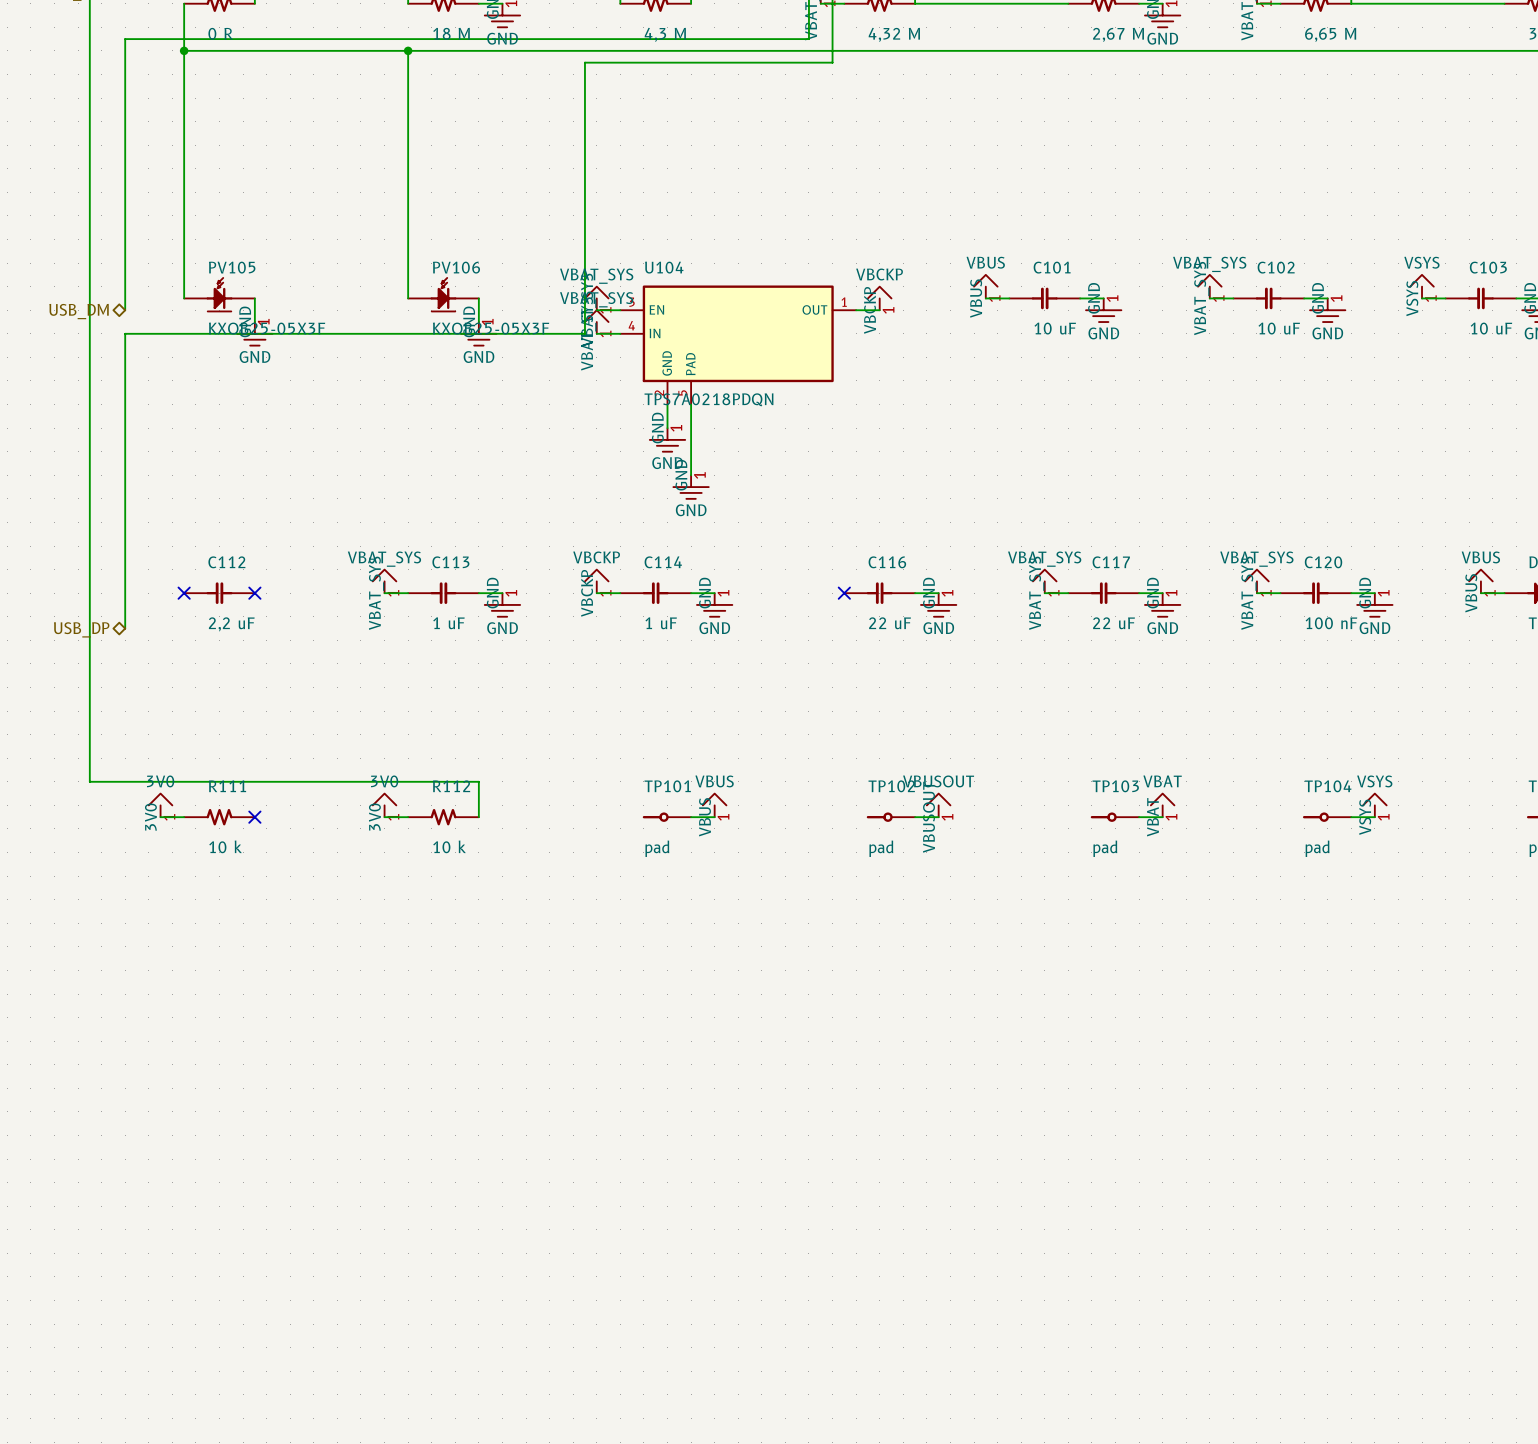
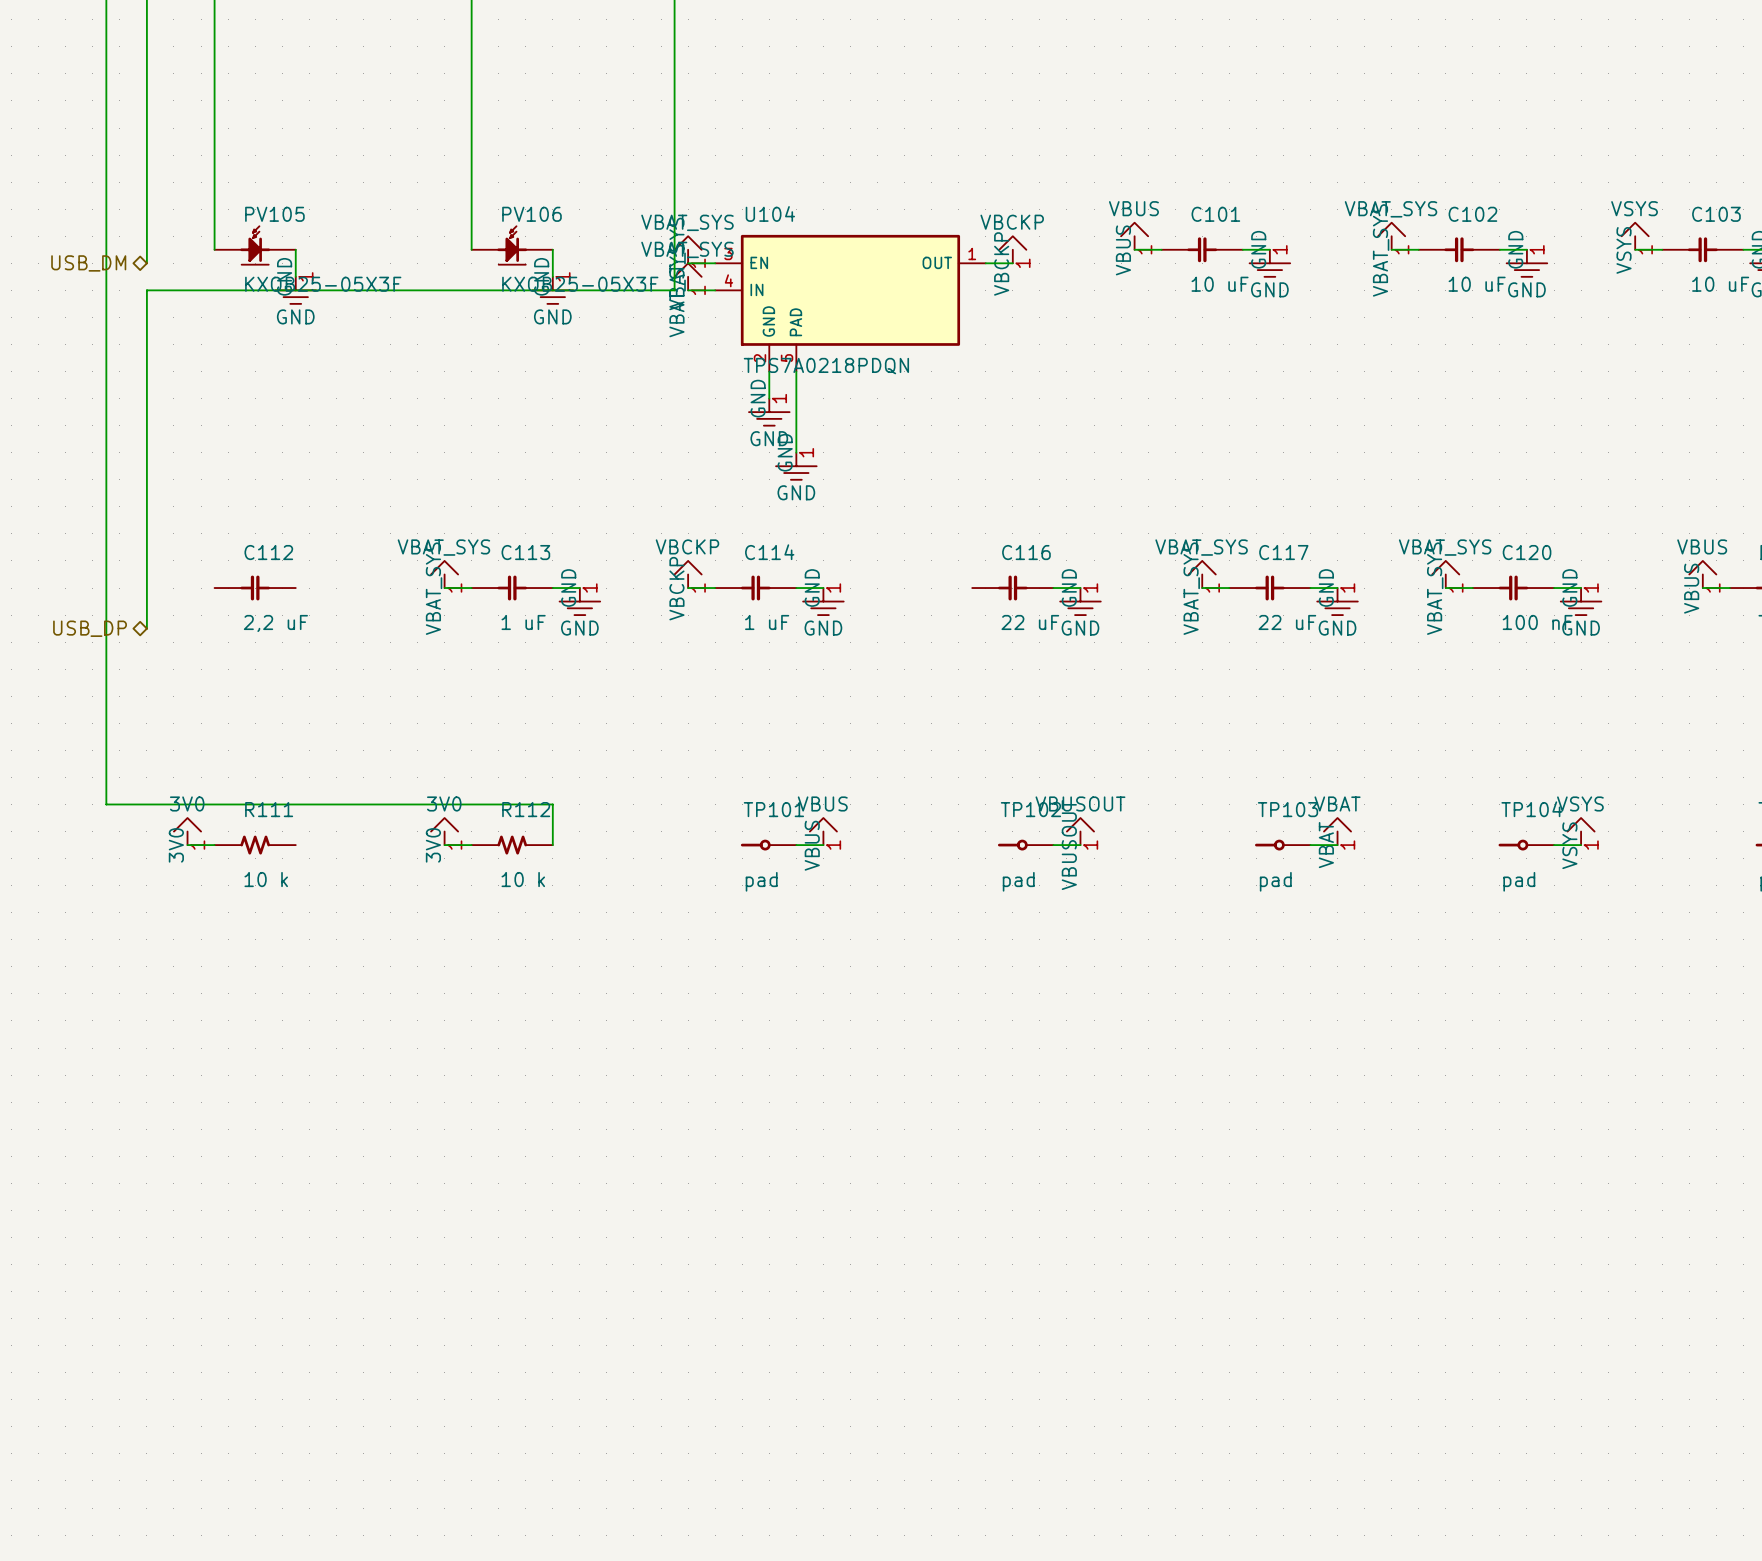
no-connect mark: (184, 593) -> none
no-connect mark: (254, 593) -> none
no-connect mark: (844, 593) -> none
no-connect mark: (254, 817) -> none

